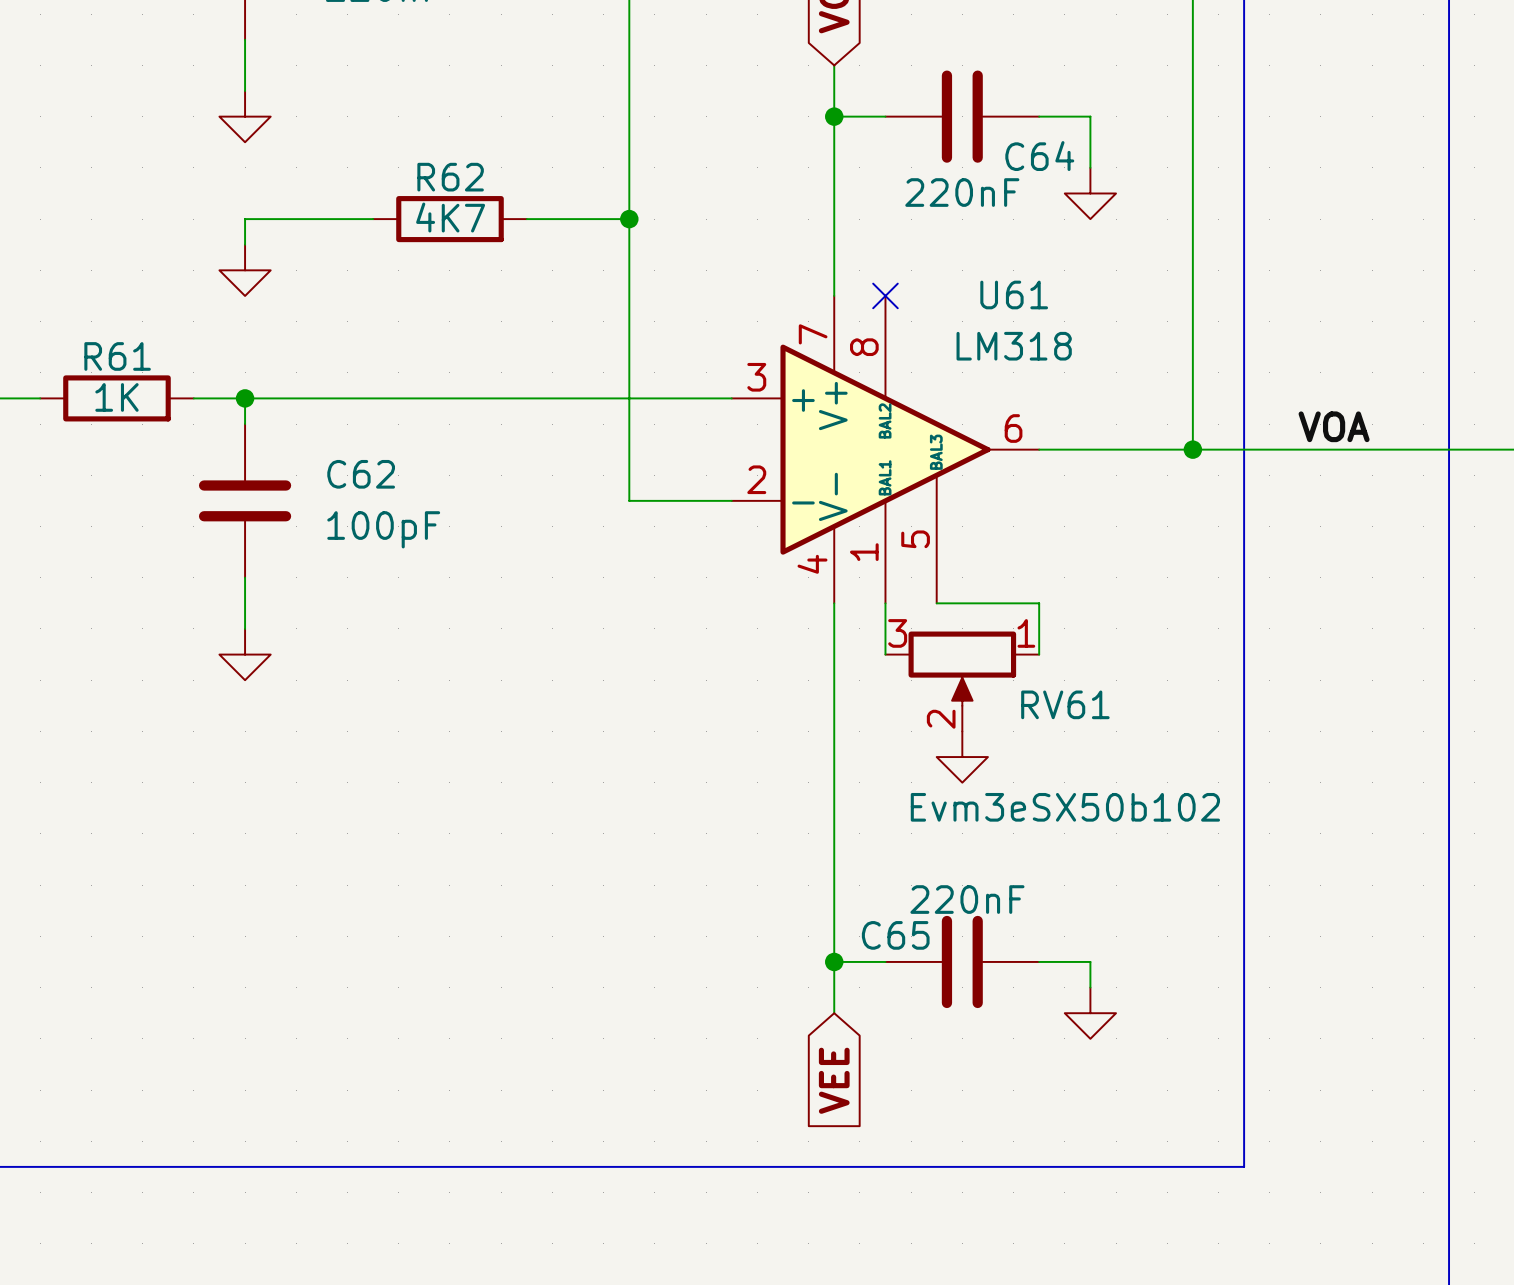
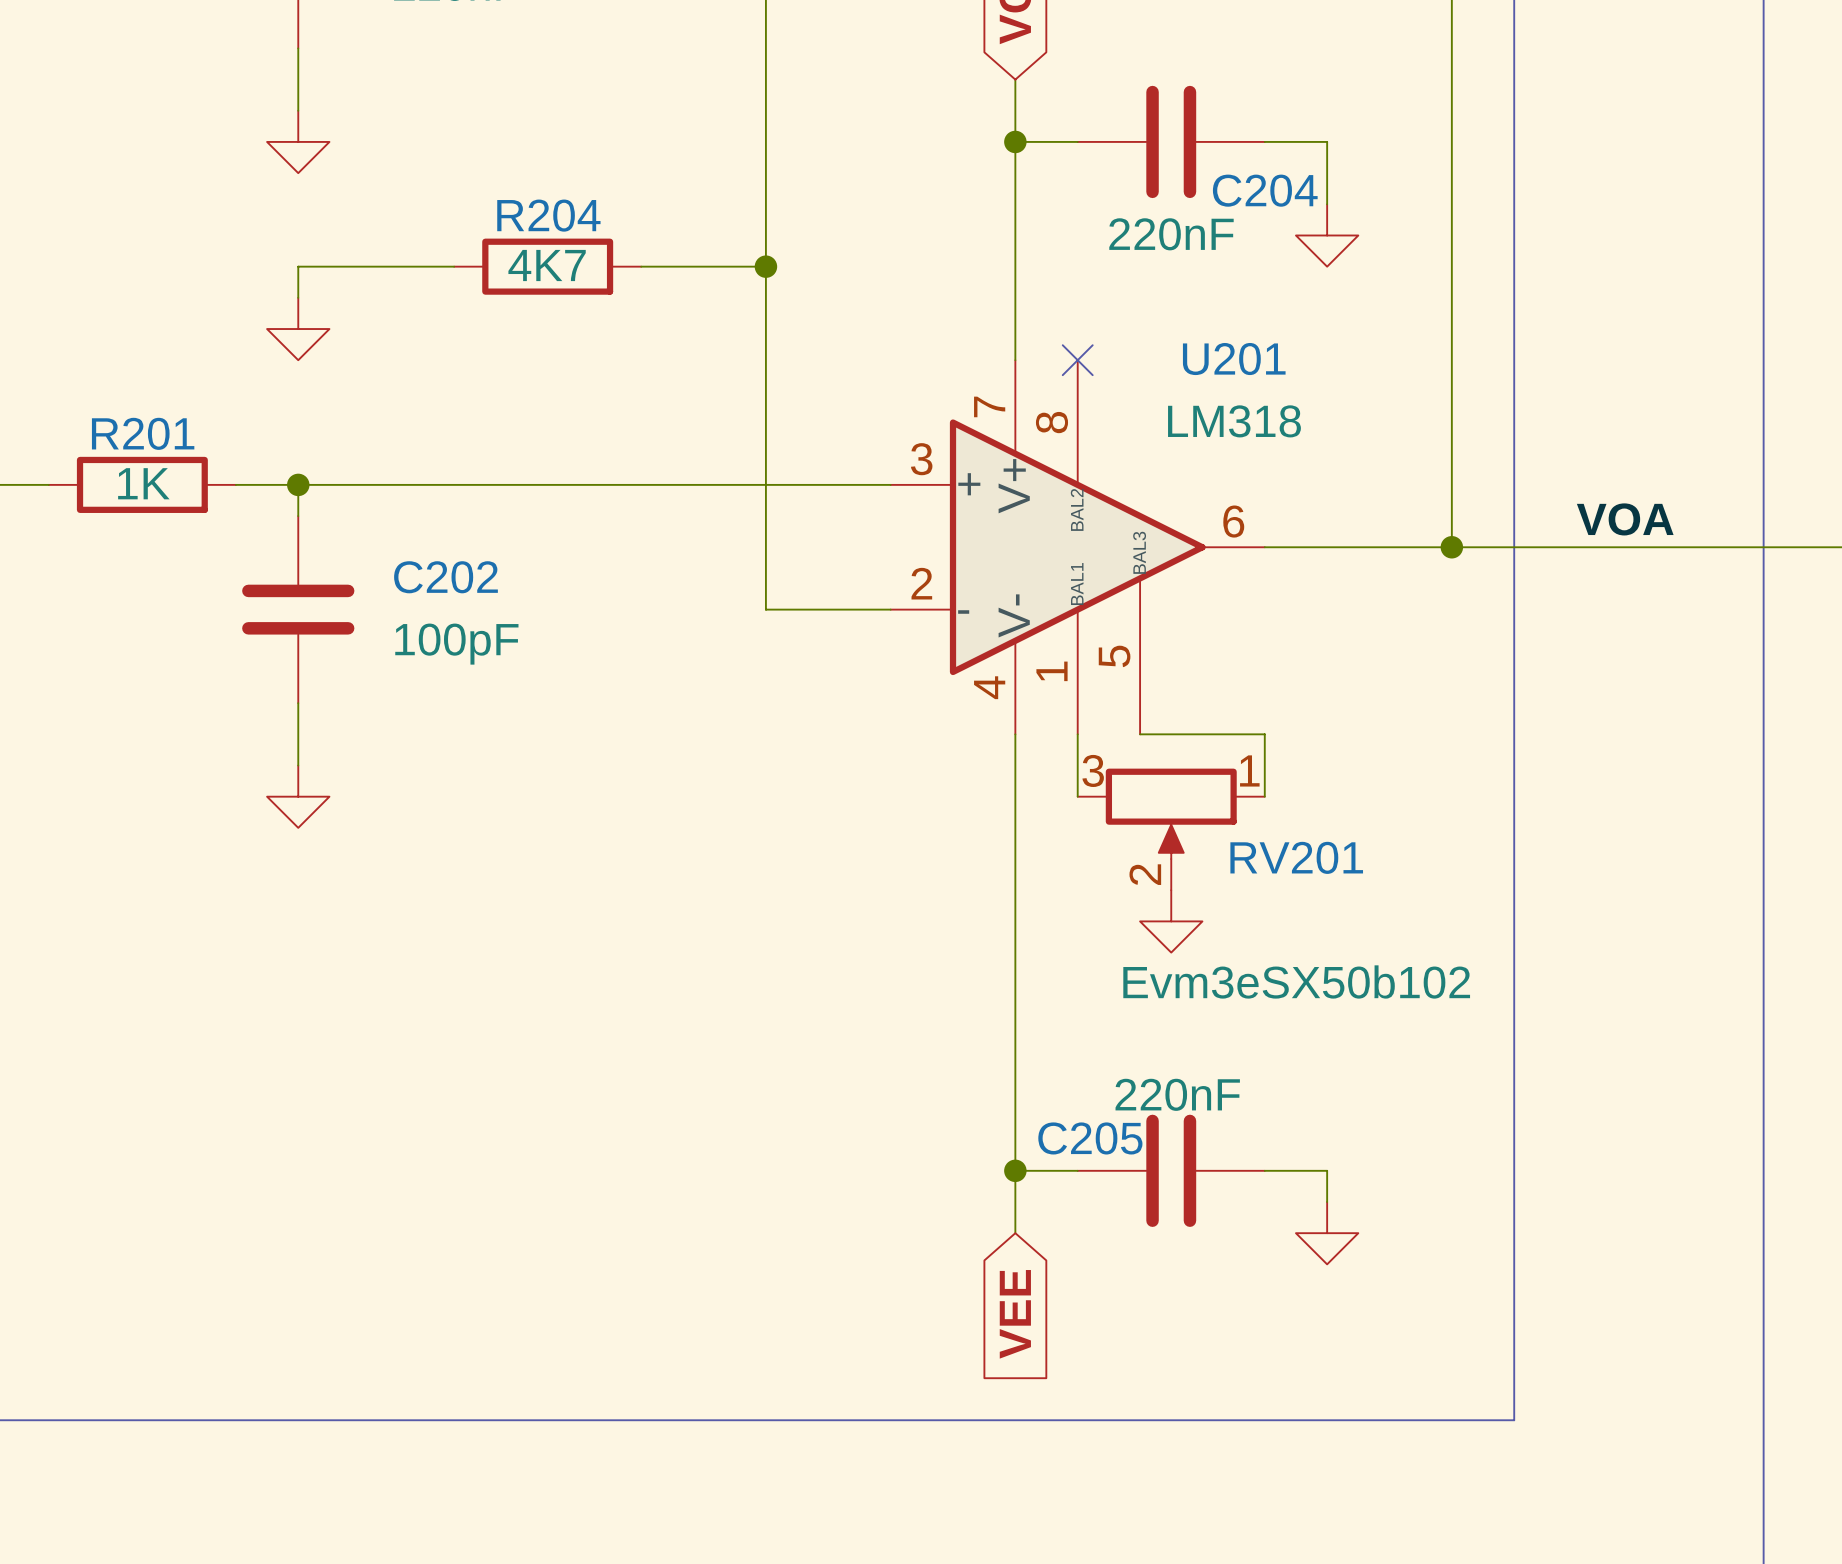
C64 name: C64 (1039, 156) -> C204 (1265, 190)
R62 name: R62 (450, 177) -> R204 (548, 215)
U61 name: U61 (1014, 294) -> U201 (1234, 359)
R61 name: R61 (117, 356) -> R201 (143, 433)
C62 name: C62 (361, 474) -> C202 (445, 577)
RV61 name: RV61 (1065, 704) -> RV201 (1296, 857)
C65 name: C65 (895, 935) -> C205 (1090, 1138)

